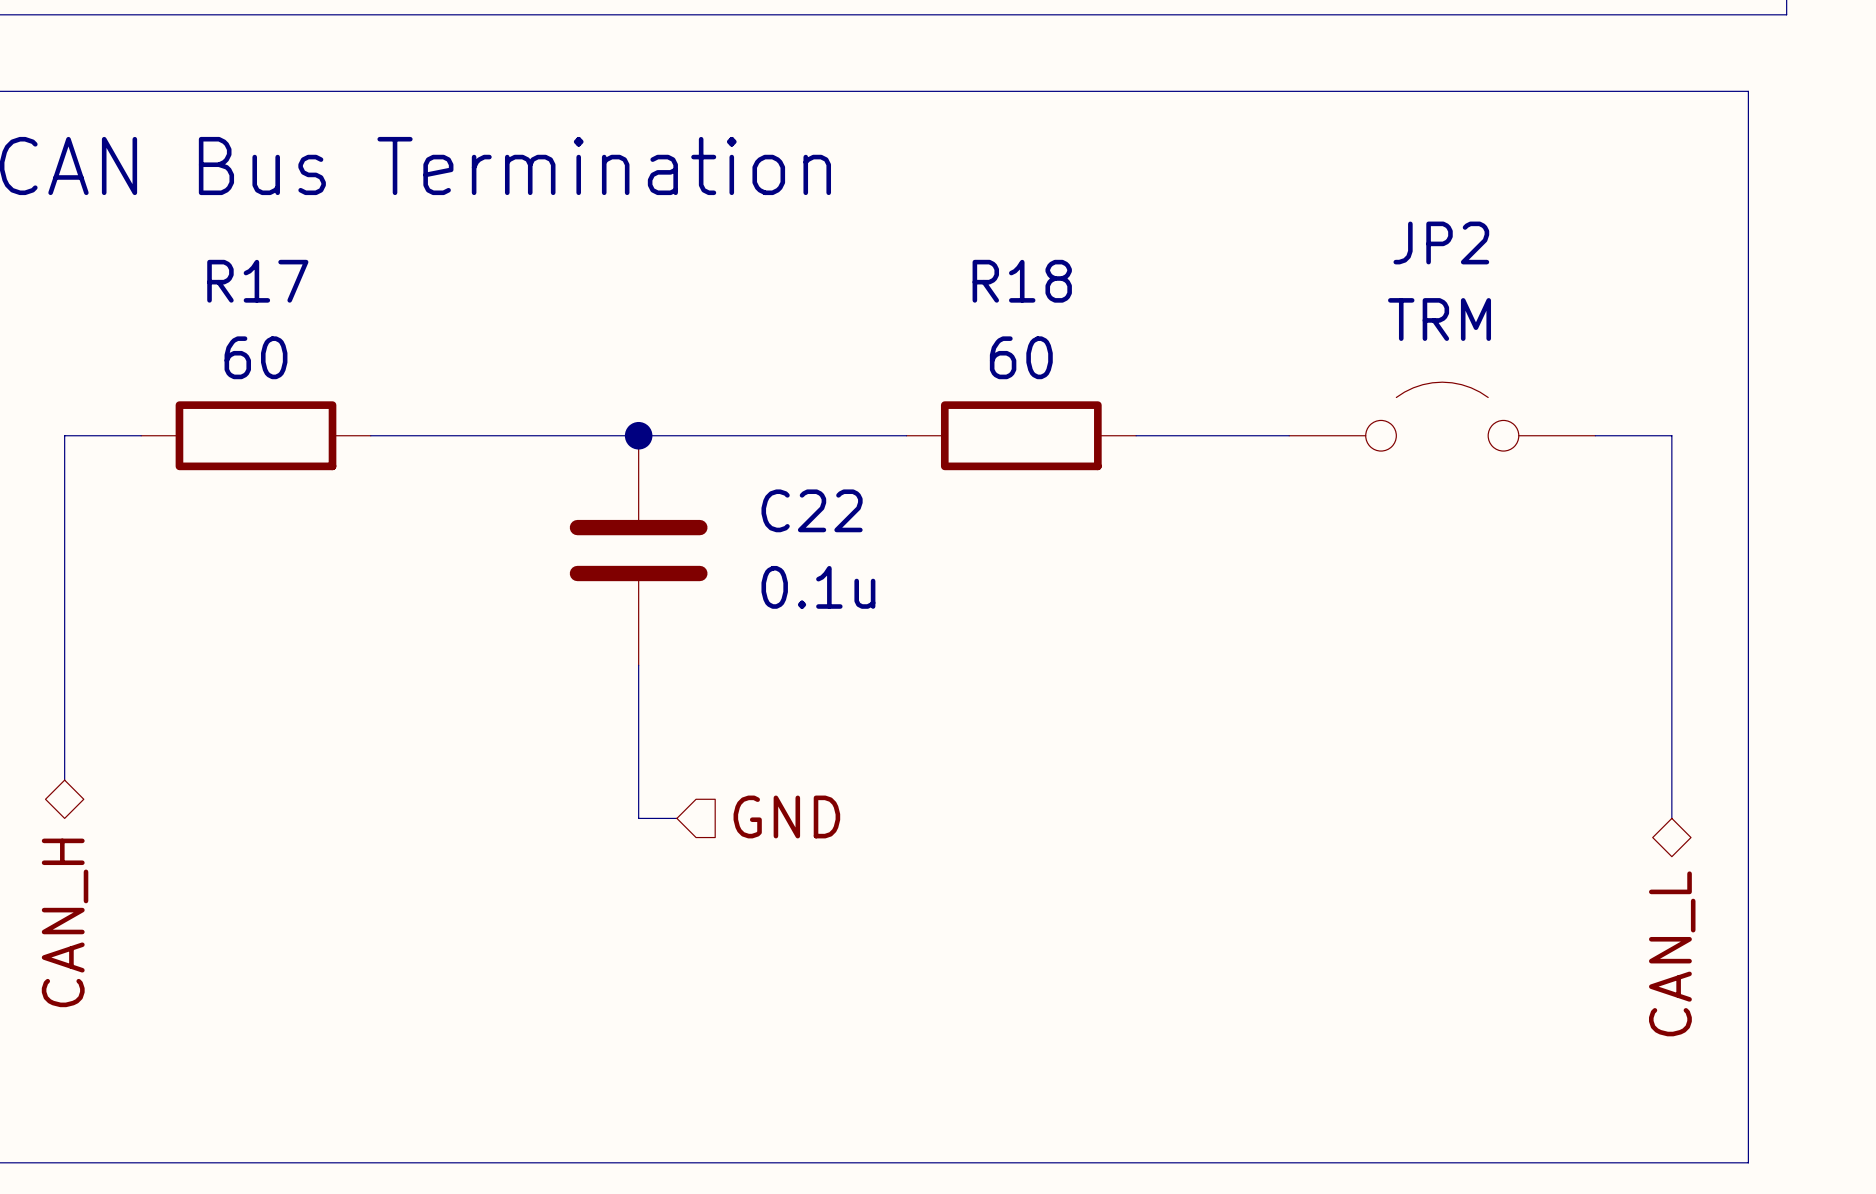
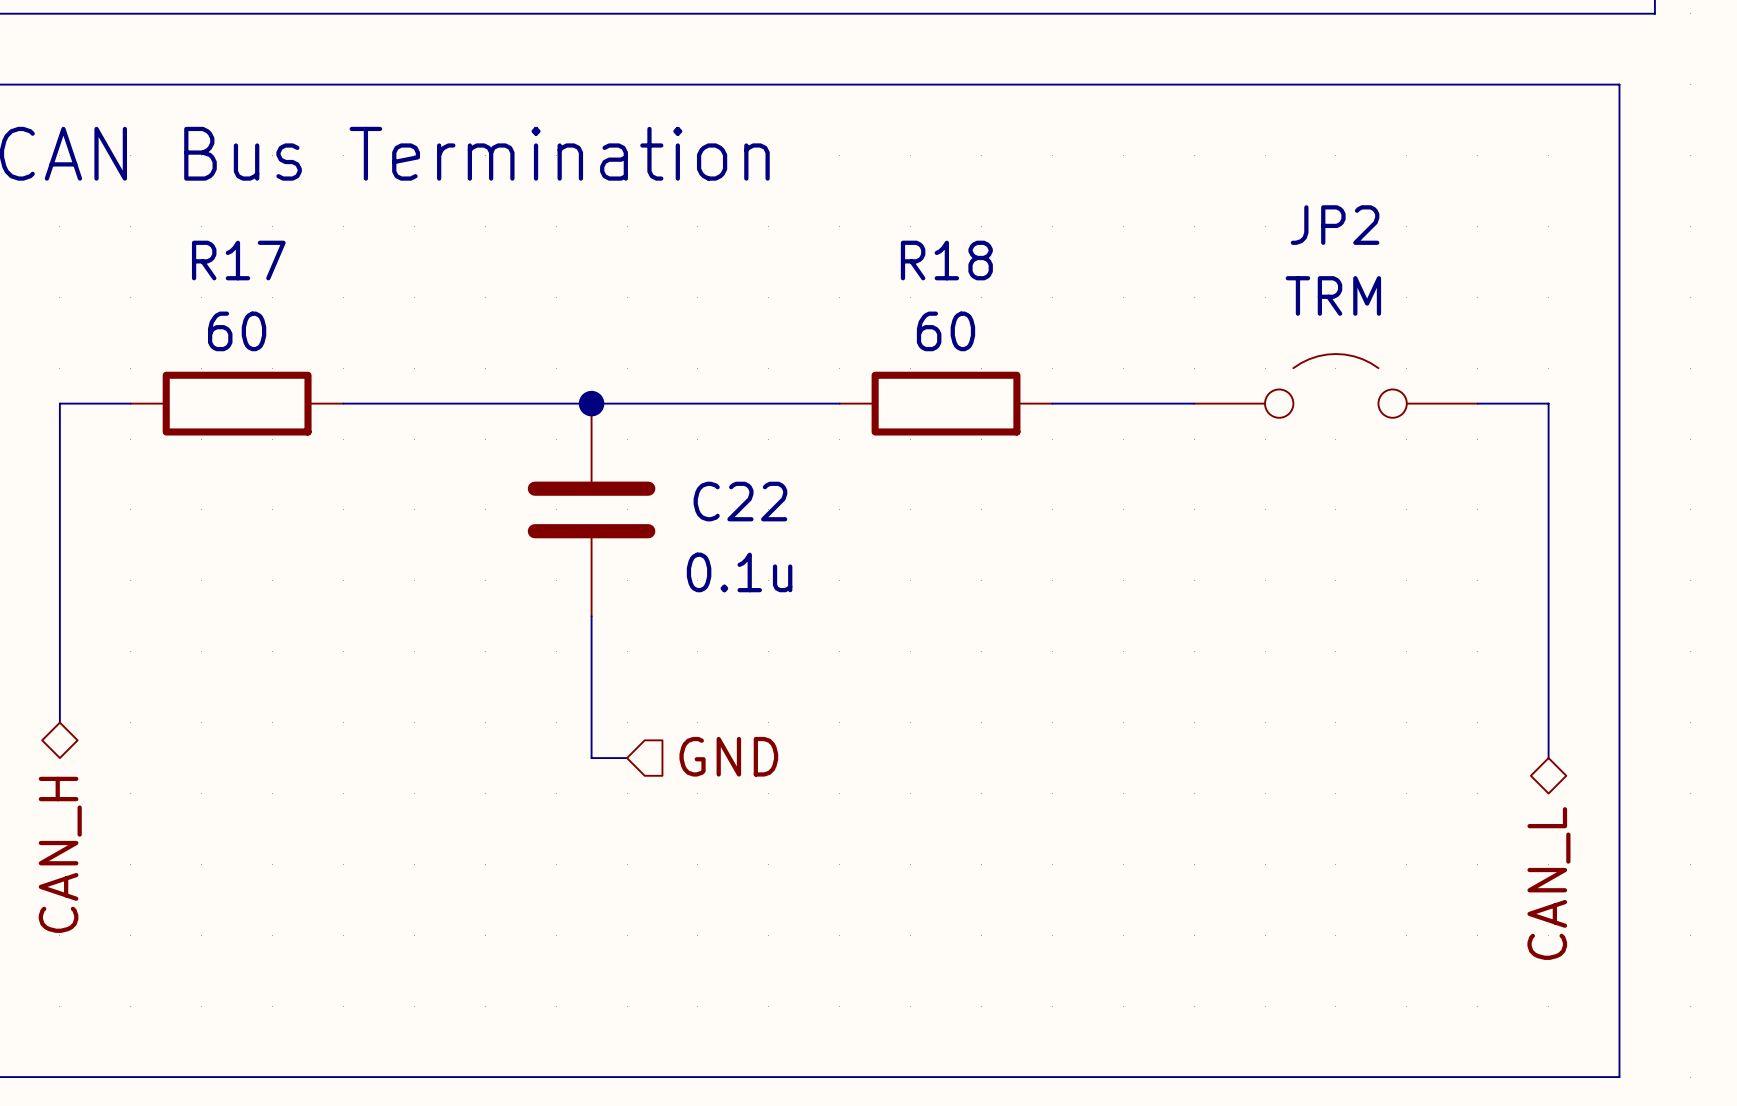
C22 name position: C22 (812, 510) -> C22 (740, 501)
C22 value position: 0.1u (818, 587) -> 0.1u (739, 572)

